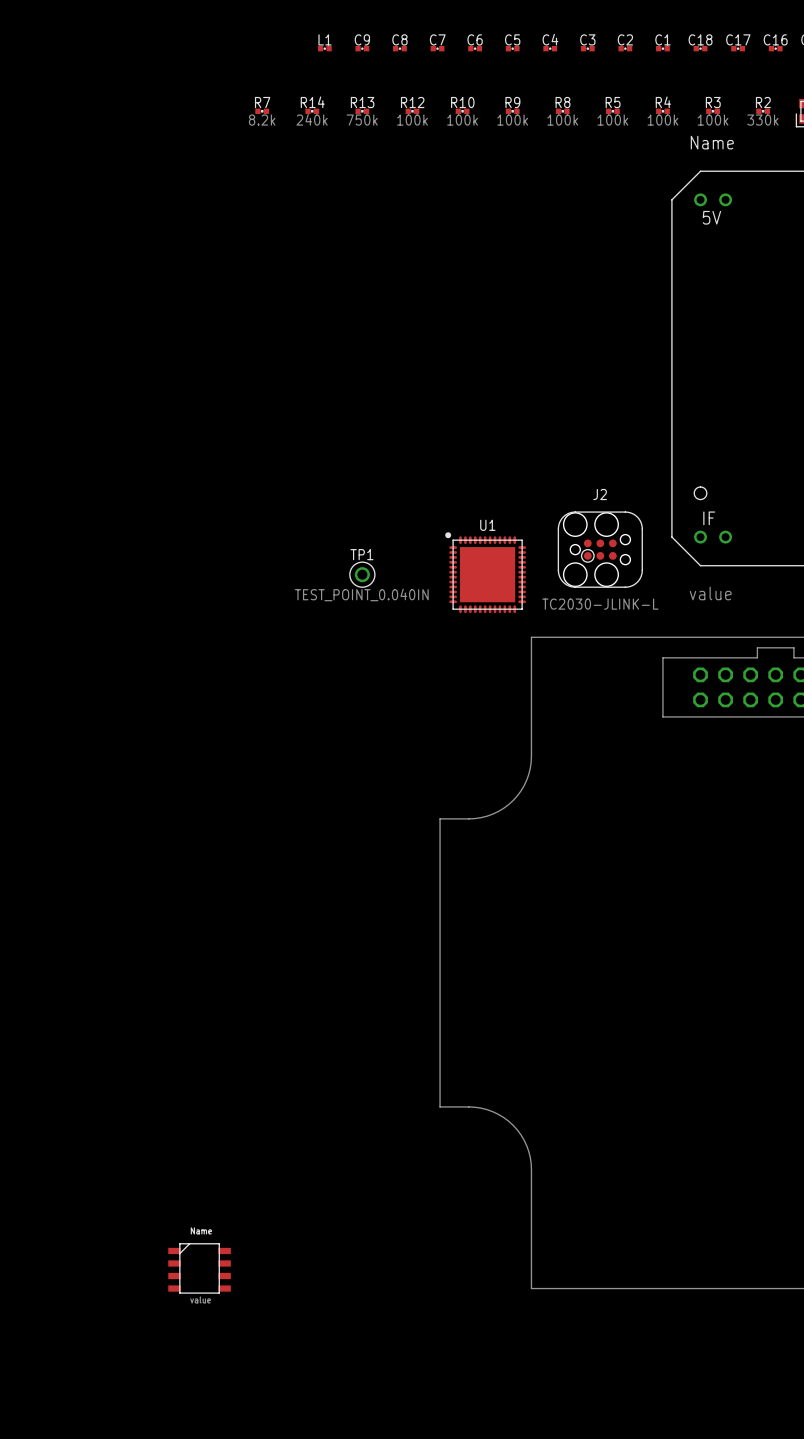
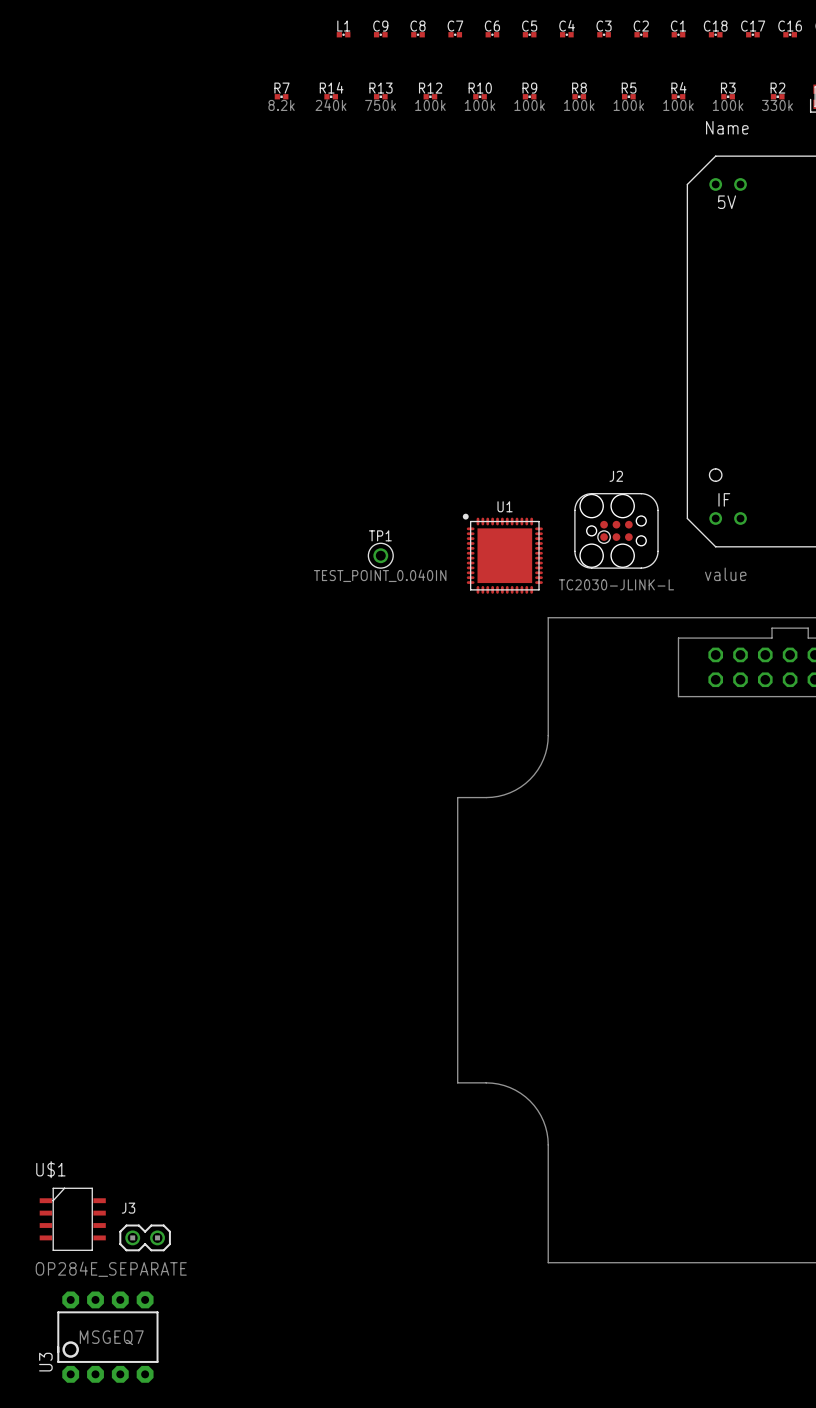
U$1: none -> OP284E_SEPARATE (72, 1219)
J3: none -> (145, 1237)
part: (199, 1268) -> none
U3: none -> MSGEQ7 (107, 1337)

